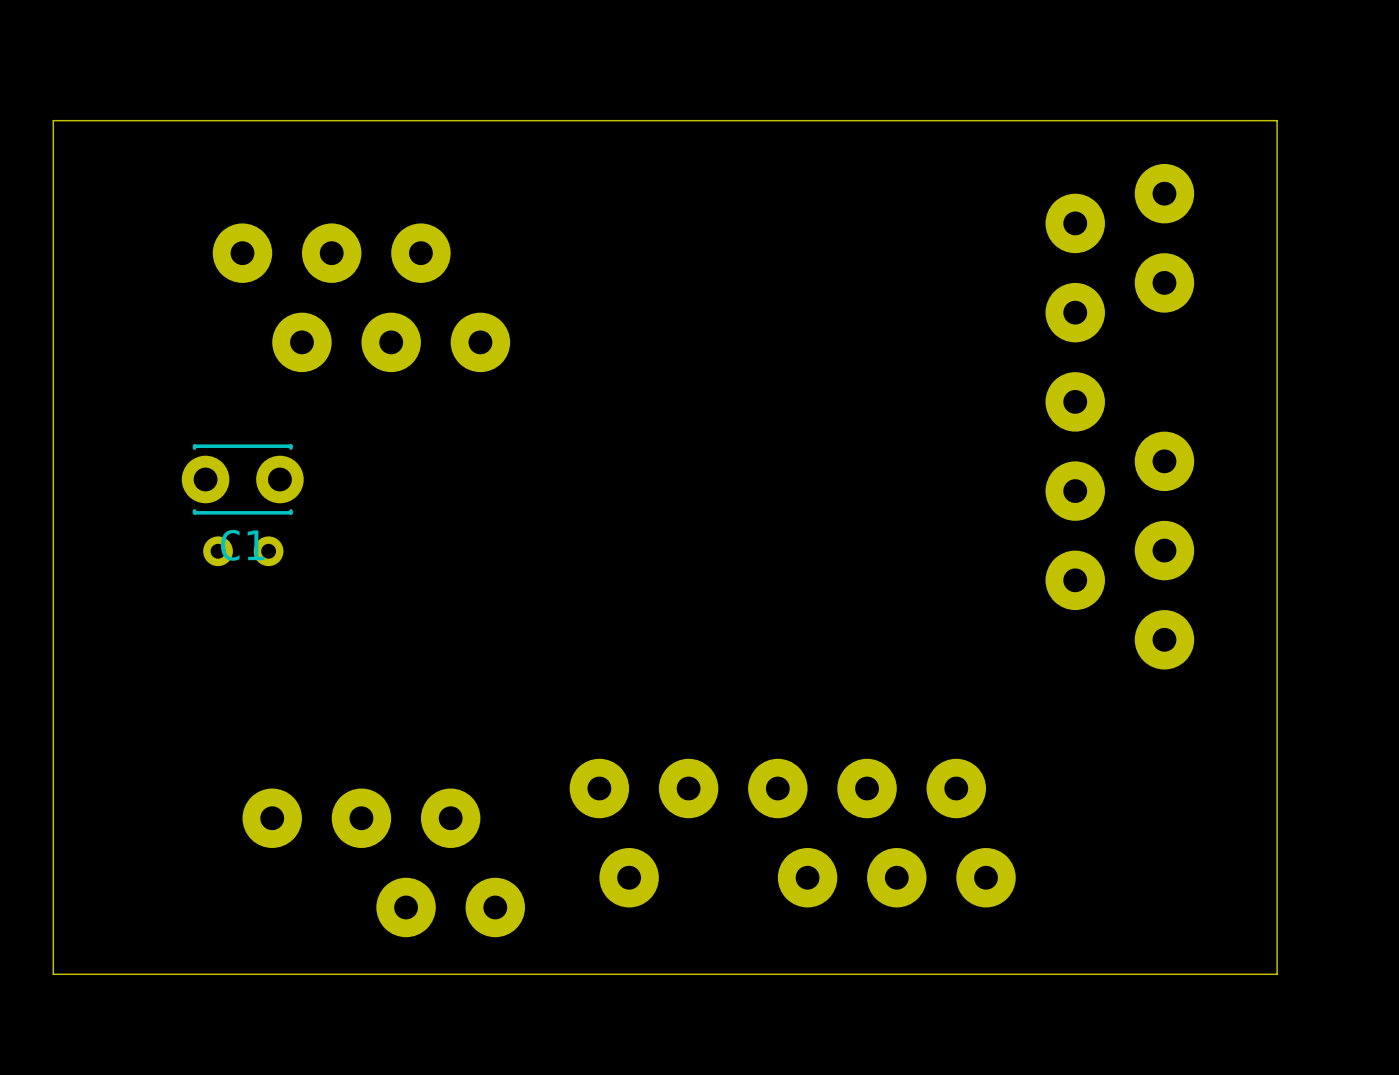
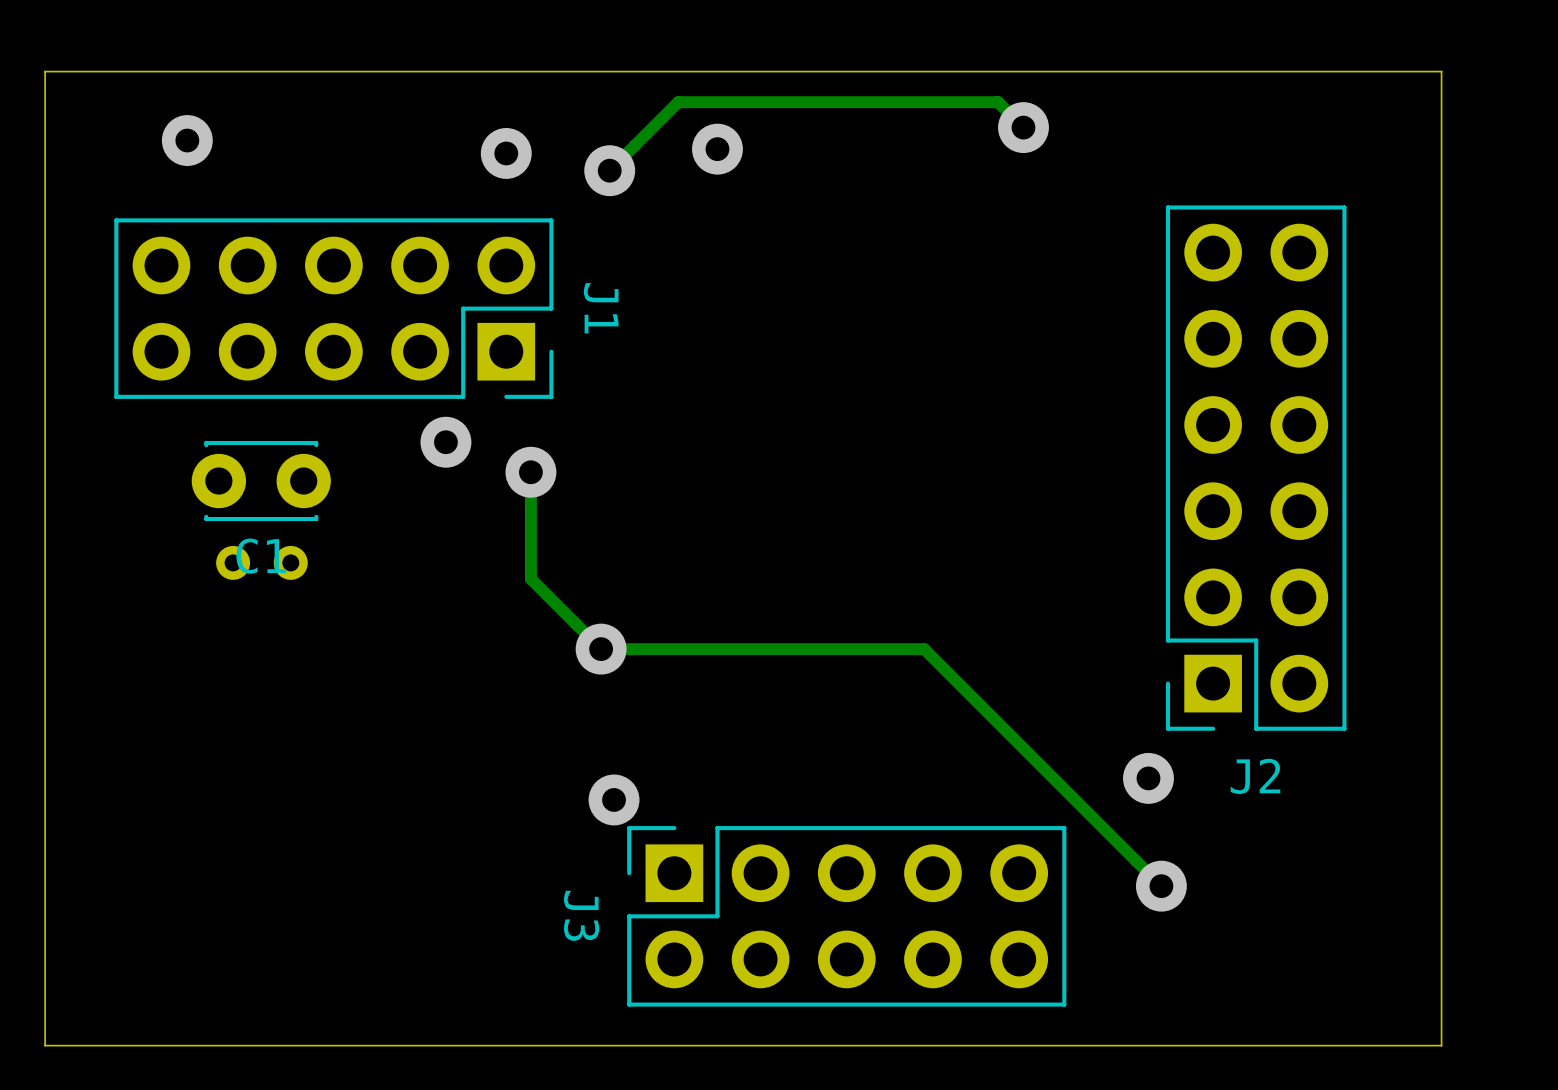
track: none -> (1023, 127) (998, 102) (678, 102) (609, 170)
via: none -> (1023, 127)
via: none -> (187, 140)
via: none -> (717, 149)
via: none -> (506, 153)
part: (1164, 193) -> none
via: none -> (609, 170)
part: (1075, 223) -> none
part: (242, 253) -> none
part: (331, 253) -> none
part: (420, 253) -> none
part: (1164, 282) -> none
part: (1075, 312) -> none
J1: none -> (333, 308)
part: (301, 342) -> none
part: (391, 342) -> none
part: (480, 342) -> none
part: (1075, 401) -> none
via: none -> (445, 442)
part: (1164, 461) -> none
J2: none -> (1256, 468)
track: none -> (530, 472) (530, 578) (601, 649) (924, 649) (1161, 886)
via: none -> (530, 472)
part: (1075, 491) -> none
part: (1164, 550) -> none
part: (1075, 580) -> none
via: none -> (601, 649)
part: (1164, 639) -> none
via: none -> (1148, 778)
via: none -> (614, 799)
part: (599, 788) -> none
part: (688, 788) -> none
part: (777, 788) -> none
part: (867, 788) -> none
part: (956, 788) -> none
part: (272, 818) -> none
part: (361, 818) -> none
part: (450, 818) -> none
via: none -> (1161, 886)
J3: none -> (846, 916)
part: (629, 877) -> none
part: (807, 877) -> none
part: (896, 877) -> none
part: (986, 877) -> none
part: (406, 907) -> none
part: (495, 907) -> none

